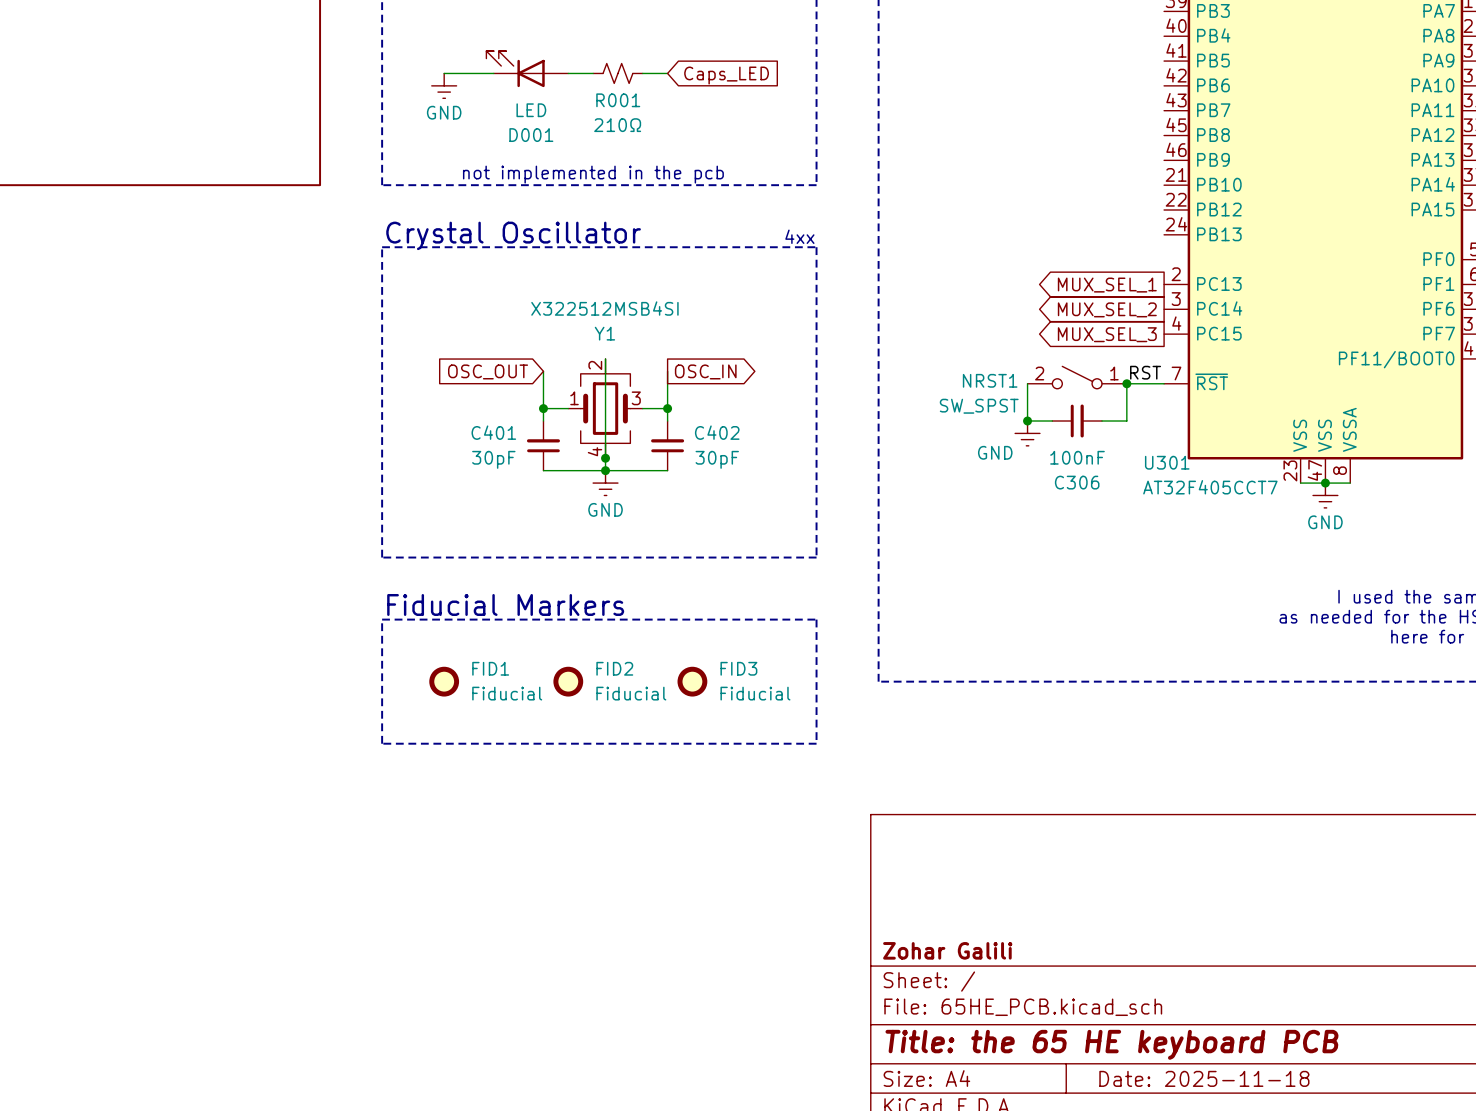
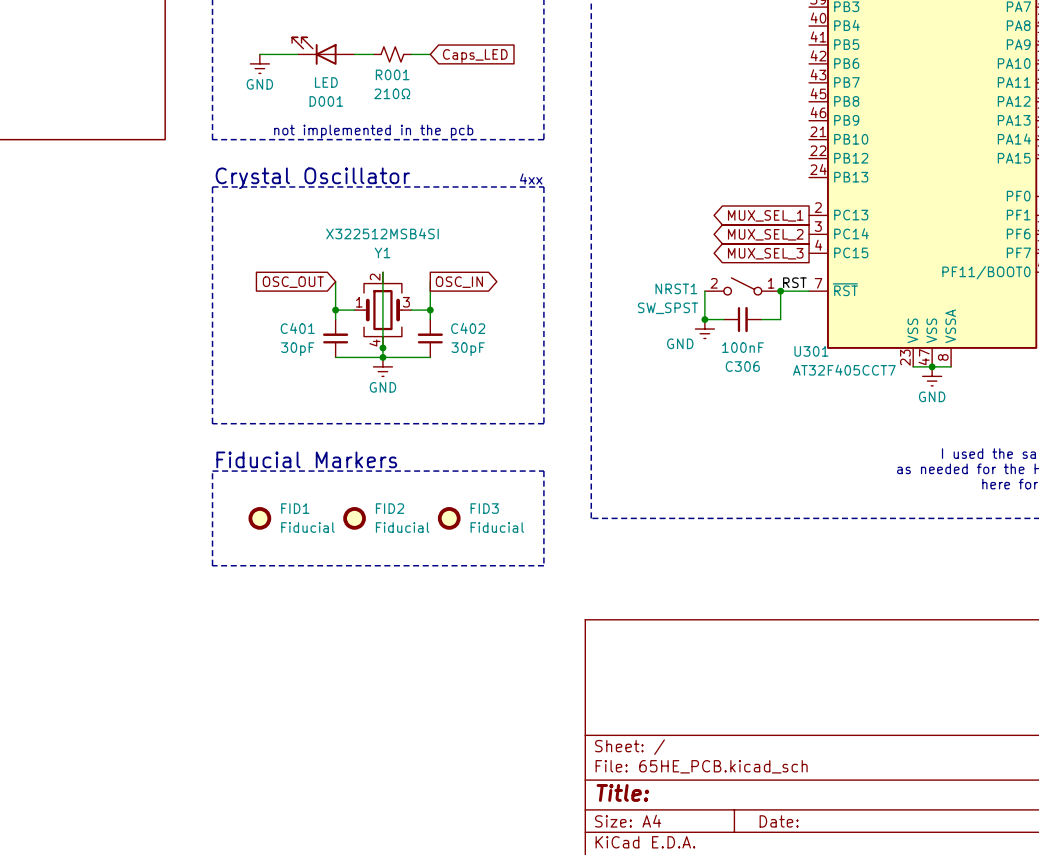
title block: Zohar Galili (947, 950) -> none
title block: Title: the 65 HE keyboard PCB (1111, 1044) -> Title: (622, 792)
title block: Date: 2025-11-18 (1204, 1078) -> Date: (779, 821)

